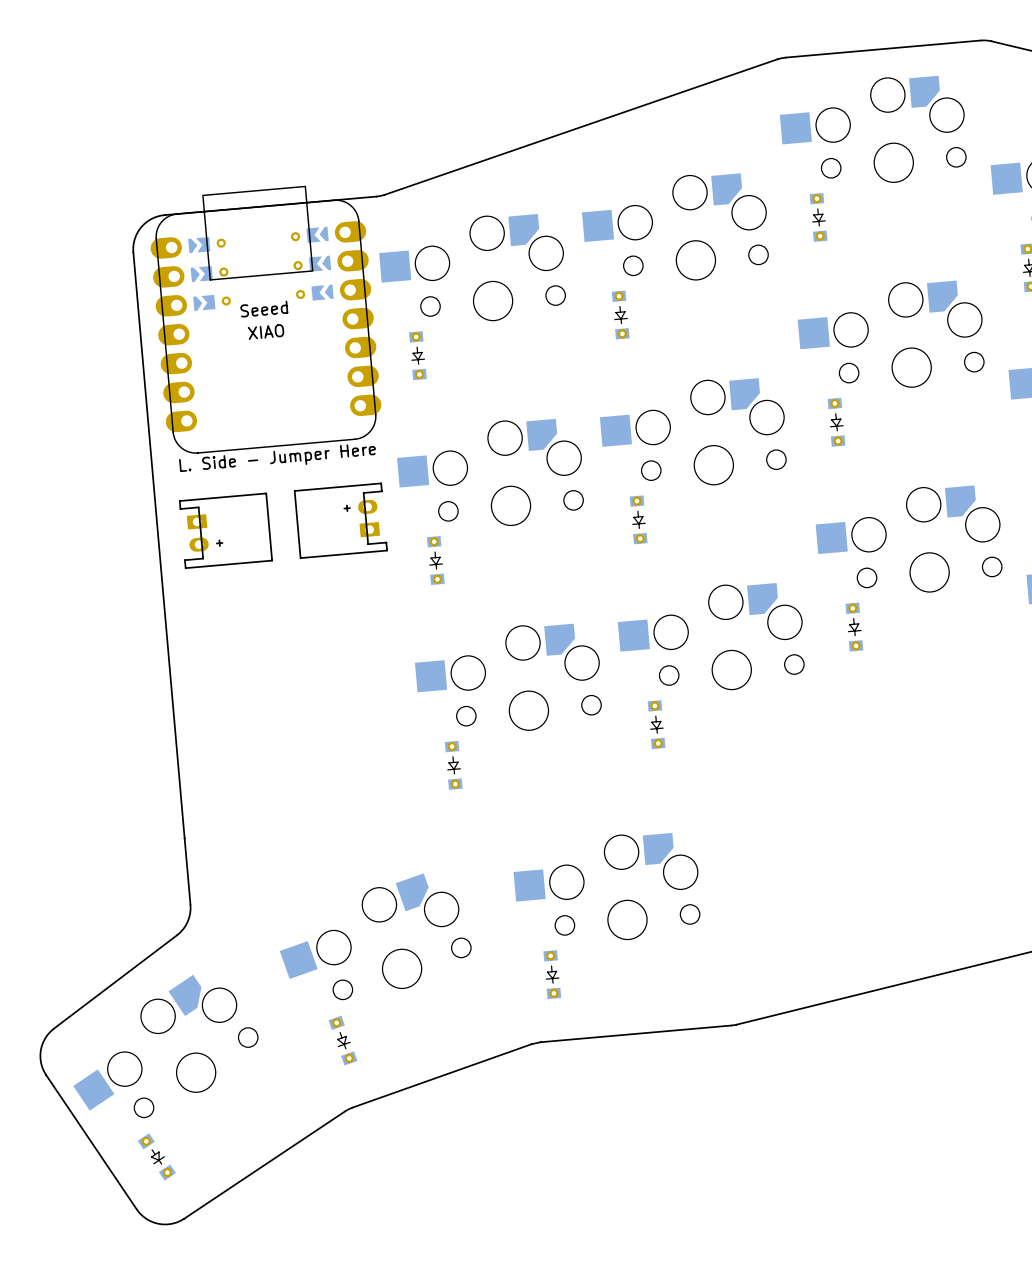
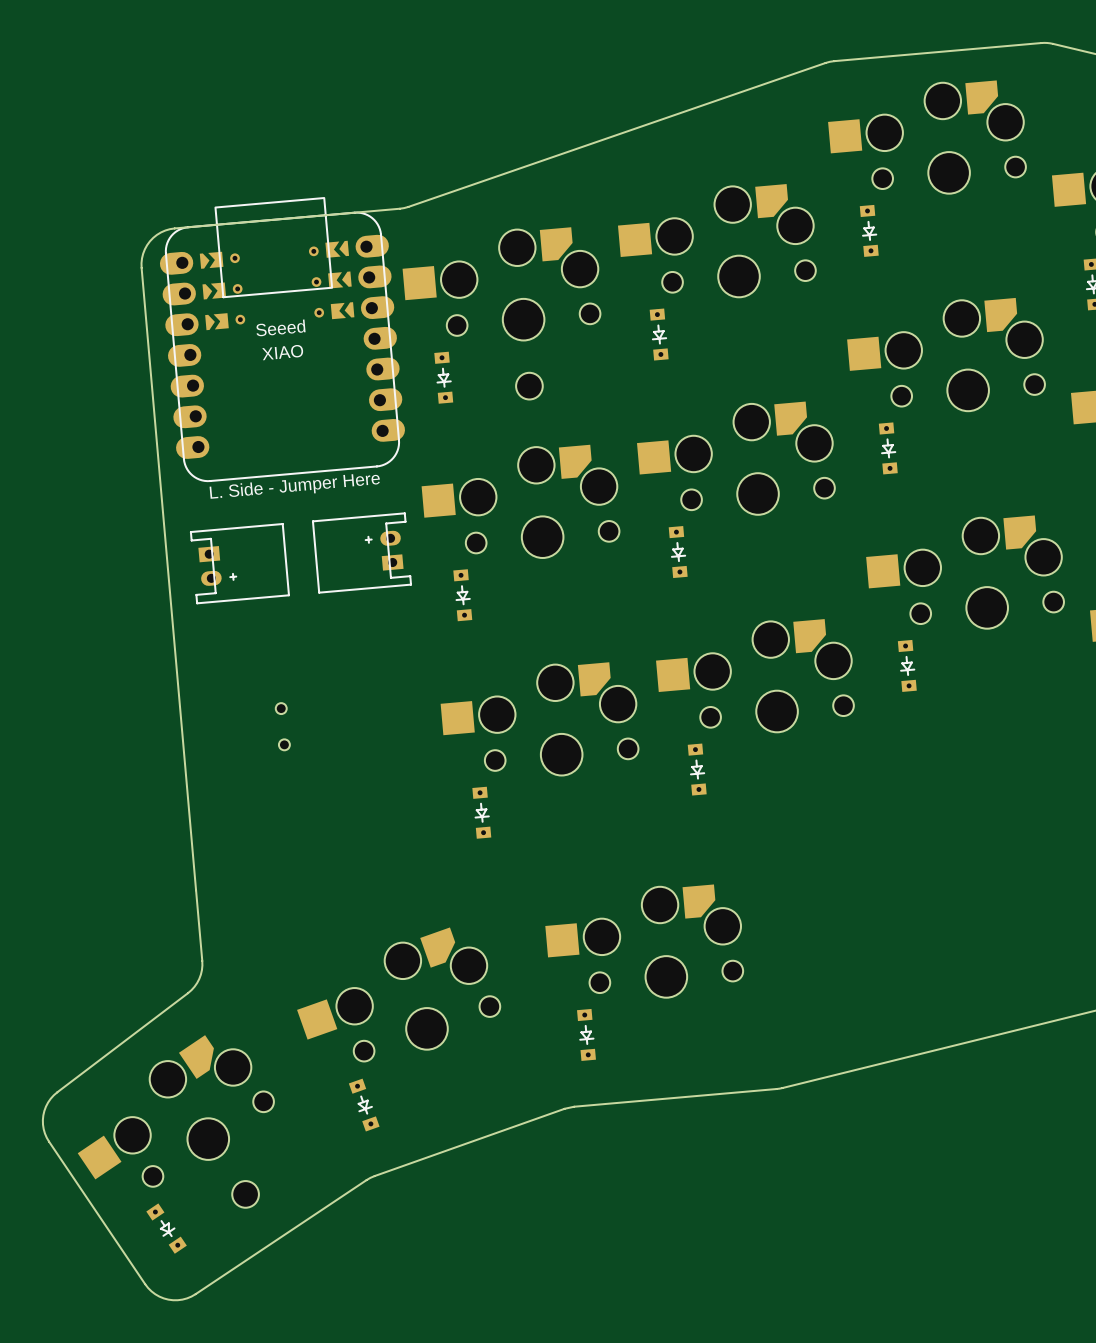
part: none -> (529, 386)
part: none -> (282, 726)
part: none -> (245, 1194)

